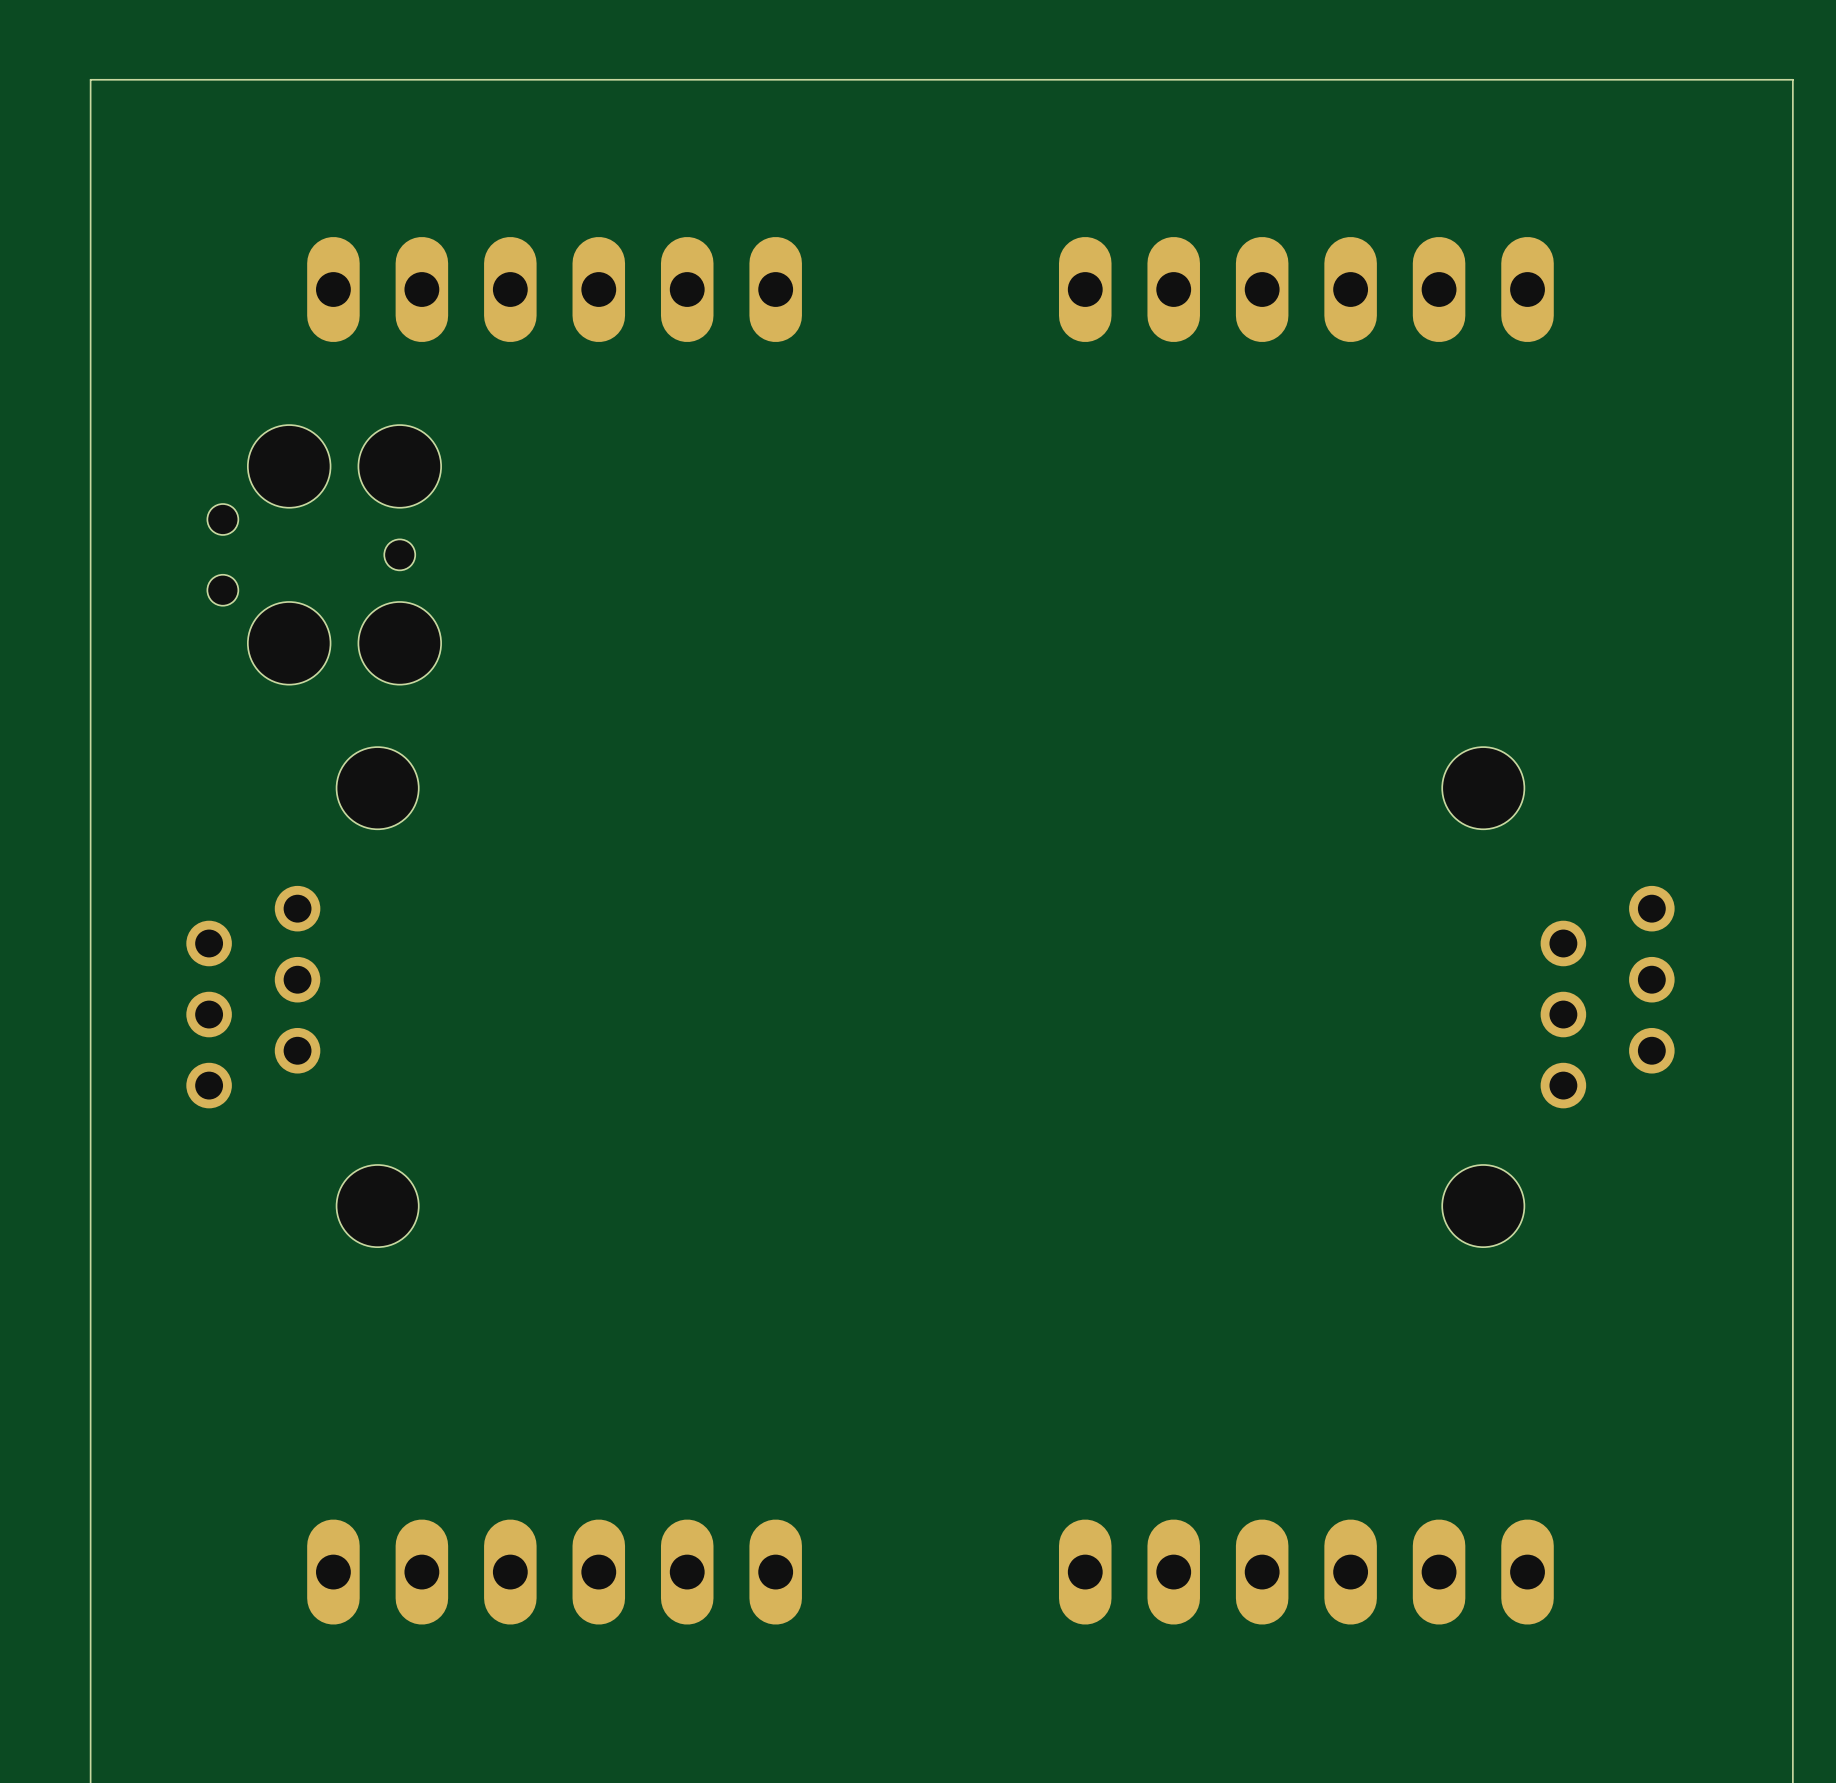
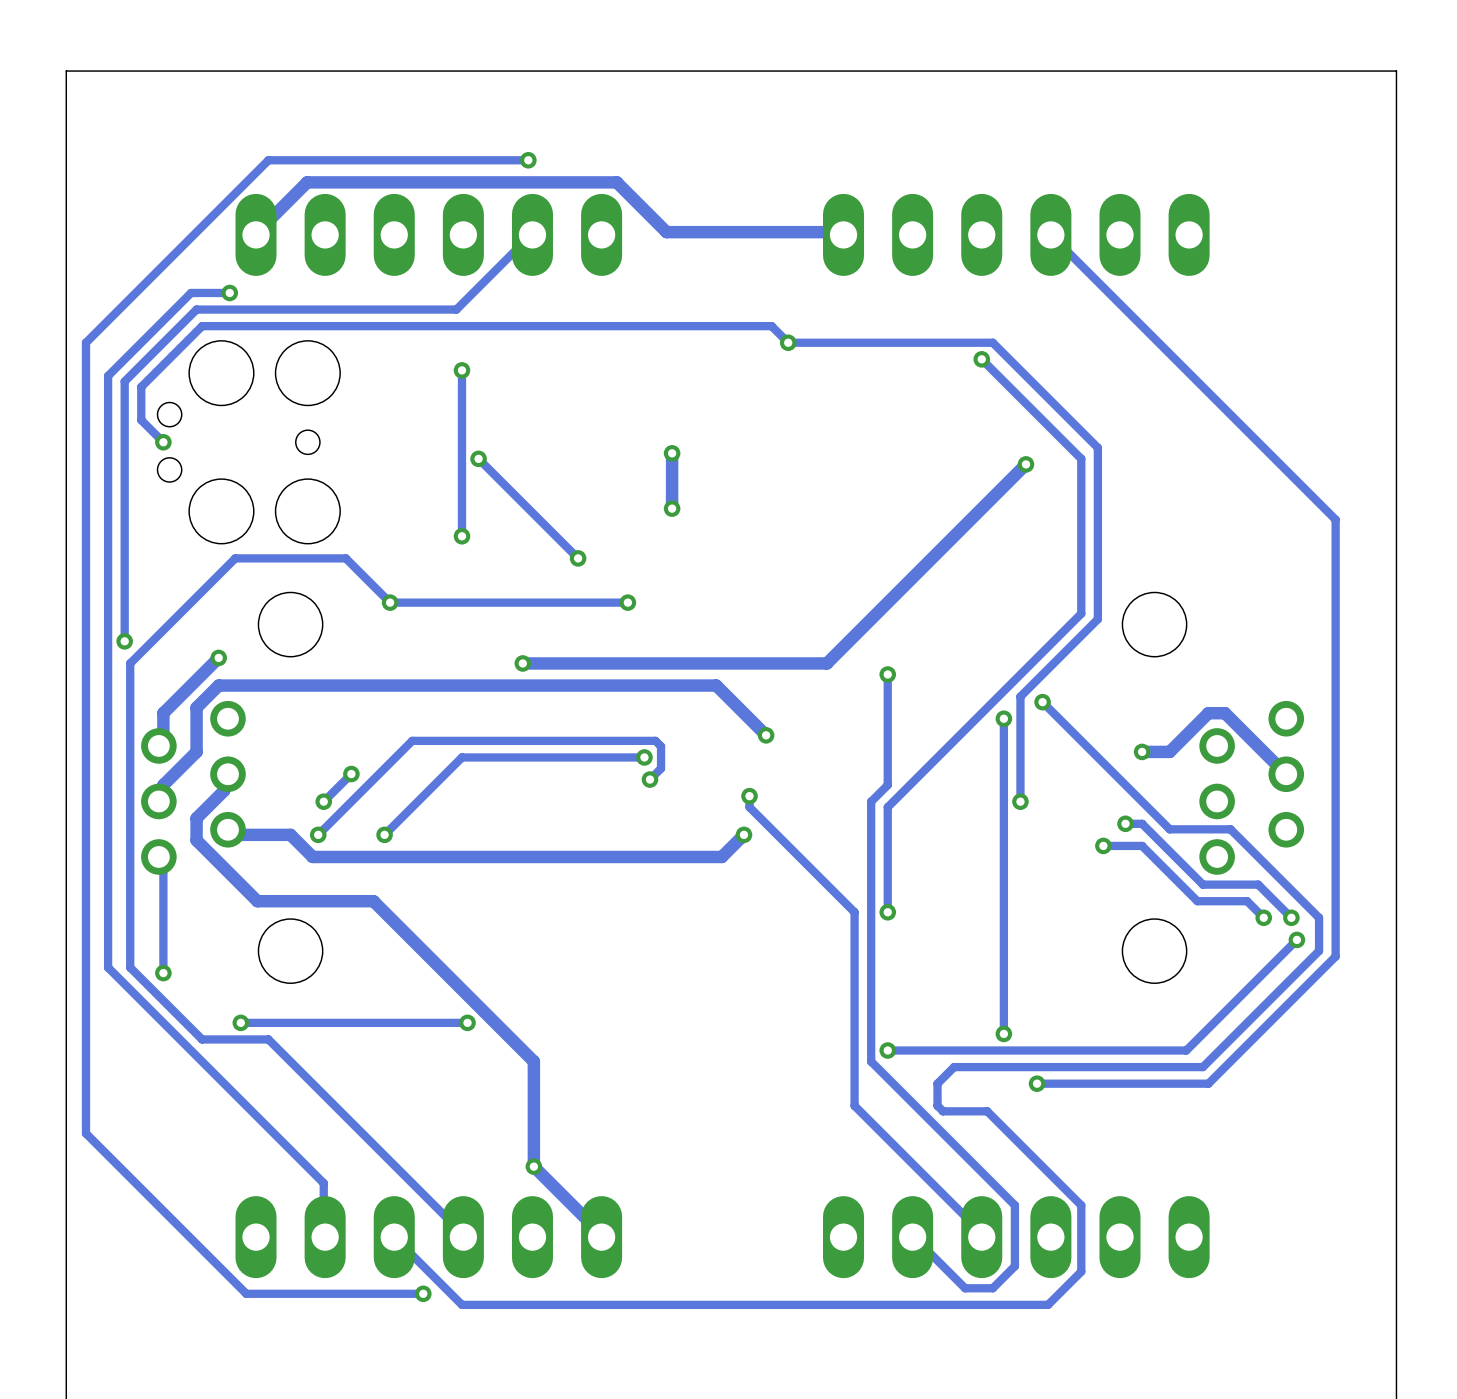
track: none -> (528, 160) (268, 160) (85, 342) (85, 1133) (246, 1293) (423, 1293)
via: none -> (528, 160)
track: none -> (532, 234) (456, 309) (196, 309) (124, 381) (124, 641)
track: none -> (843, 234) (843, 232) (666, 232) (616, 182) (307, 182) (256, 234)
track: none -> (1050, 234) (1335, 519) (1335, 956) (1208, 1083) (1037, 1083)
track: none -> (229, 292) (191, 292) (108, 375) (108, 967) (323, 1183) (325, 1237)
via: none -> (229, 292)
via: none -> (788, 342)
track: none -> (981, 359) (1081, 458) (1081, 613) (887, 807) (887, 912)
via: none -> (981, 359)
track: none -> (461, 370) (461, 536)
via: none -> (461, 370)
track: none -> (163, 442) (141, 420) (141, 386) (202, 326) (771, 326) (788, 342) (992, 342) (1097, 447) (1097, 619) (1020, 696) (1020, 801)
via: none -> (163, 442)
track: none -> (672, 453) (672, 508)
via: none -> (672, 453)
track: none -> (478, 458) (578, 558)
via: none -> (478, 458)
track: none -> (1025, 464) (826, 663) (522, 663)
via: none -> (1025, 464)
via: none -> (672, 508)
via: none -> (461, 536)
via: none -> (578, 558)
via: none -> (390, 602)
track: none -> (627, 602) (390, 602) (345, 558) (235, 558) (130, 663) (130, 967) (202, 1039) (268, 1039) (461, 1232) (463, 1237)
via: none -> (627, 602)
via: none -> (124, 641)
track: none -> (218, 657) (163, 713) (163, 740) (158, 745)
via: none -> (218, 657)
via: none -> (522, 663)
track: none -> (887, 674) (887, 785) (871, 801) (871, 1061) (1014, 1205) (1014, 1266) (992, 1288) (965, 1288) (912, 1237)
via: none -> (887, 674)
track: none -> (1042, 702) (1169, 829) (1230, 829) (1319, 917) (1319, 950) (1202, 1067) (954, 1067) (937, 1083) (937, 1105) (943, 1111) (987, 1111) (1081, 1205) (1081, 1271) (1048, 1304) (461, 1304) (394, 1237)
via: none -> (1042, 702)
track: none -> (1003, 718) (1003, 1033)
via: none -> (1003, 718)
track: none -> (766, 735) (716, 685) (218, 685) (196, 707) (196, 751) (163, 785) (163, 796) (158, 801)
via: none -> (766, 735)
track: none -> (1142, 751) (1169, 751) (1208, 713) (1225, 713) (1285, 774)
via: none -> (1142, 751)
track: none -> (644, 757) (461, 757) (384, 834)
via: none -> (644, 757)
track: none -> (227, 774) (224, 779) (224, 790) (196, 818) (196, 840) (257, 901) (373, 901) (533, 1061) (533, 1166) (600, 1232) (601, 1237)
track: none -> (351, 774) (323, 801)
via: none -> (351, 774)
track: none -> (649, 779) (661, 768) (661, 746) (655, 740) (412, 740) (318, 834)
via: none -> (649, 779)
track: none -> (749, 796) (749, 807) (854, 912) (854, 1105) (981, 1232) (981, 1237)
via: none -> (749, 796)
via: none -> (323, 801)
via: none -> (1020, 801)
track: none -> (1125, 823) (1142, 823) (1202, 884) (1258, 884) (1291, 917)
via: none -> (1125, 823)
track: none -> (227, 829) (229, 834) (290, 834) (312, 856) (721, 856) (743, 834)
via: none -> (318, 834)
via: none -> (384, 834)
via: none -> (743, 834)
track: none -> (1103, 845) (1142, 845) (1197, 901) (1247, 901) (1263, 917)
via: none -> (1103, 845)
track: none -> (158, 856) (163, 856) (163, 973)
via: none -> (887, 912)
via: none -> (1263, 917)
via: none -> (1291, 917)
track: none -> (1296, 939) (1186, 1050) (887, 1050)
via: none -> (1296, 939)
via: none -> (163, 973)
via: none -> (240, 1022)
track: none -> (467, 1022) (240, 1022)
via: none -> (467, 1022)
via: none -> (1003, 1033)
via: none -> (887, 1050)
via: none -> (1037, 1083)
via: none -> (533, 1166)
via: none -> (423, 1293)

